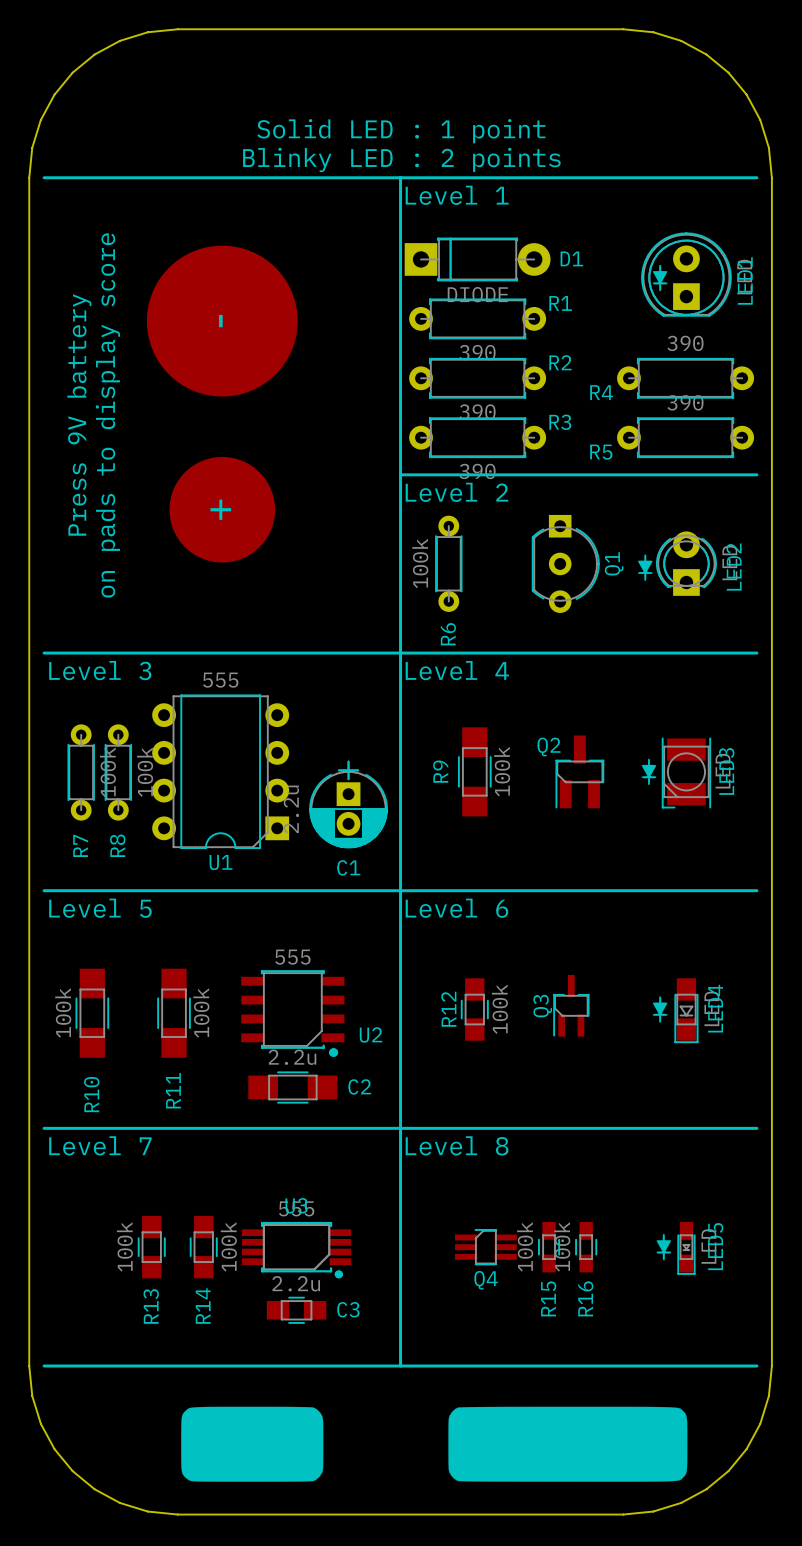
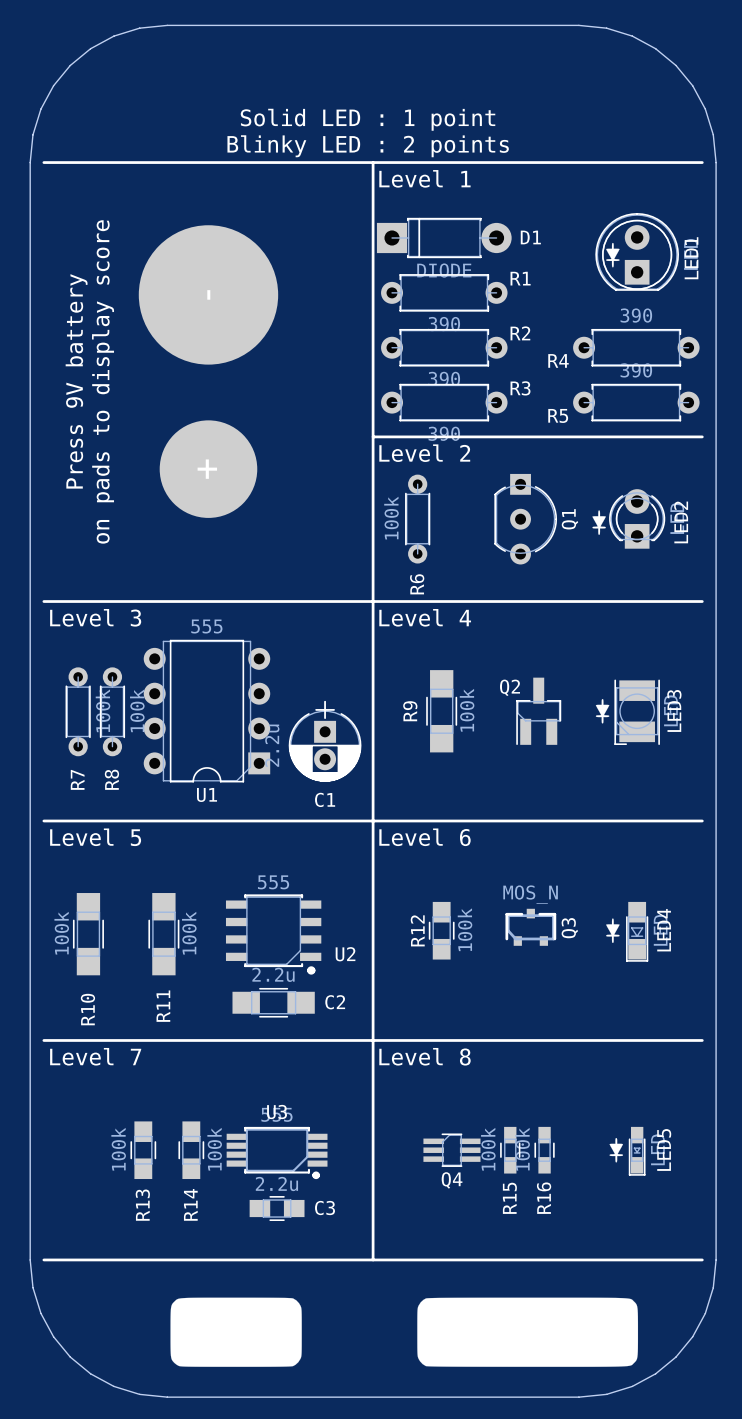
Q3 value: none -> MOS_N (530, 894)
Q3 footprint: [553, 974, 590, 1037] -> [505, 908, 557, 946]
Q3 name position: Q3 (542, 1006) -> Q3 (569, 928)

